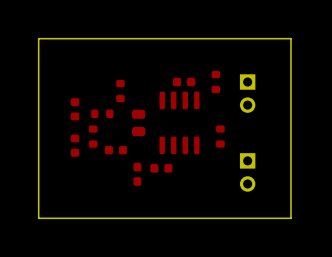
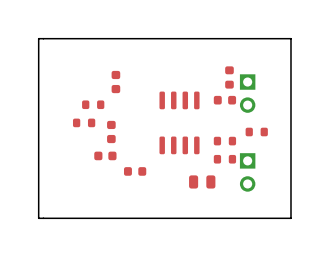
part: none -> (229, 77)
part: none -> (115, 82)
part: (184, 82) -> none
part: (215, 82) -> none
part: (120, 91) -> none
part: none -> (224, 100)
part: none -> (93, 104)
part: (75, 109) -> none
part: (102, 113) -> none
part: none -> (84, 122)
part rotation: 0° (138, 122) -> 90° clockwise (202, 181)
part position: (138, 122) -> (202, 181)
part: none -> (111, 131)
part: none -> (256, 131)
part: (93, 136) -> none
part rotation: 0° (220, 136) -> 90° clockwise (224, 141)
part: (75, 145) -> none
part: (115, 150) -> none
part: none -> (105, 155)
part: none -> (224, 159)
part footprint: [133, 162, 142, 186] -> [123, 167, 147, 176]
part: (161, 168) -> none

